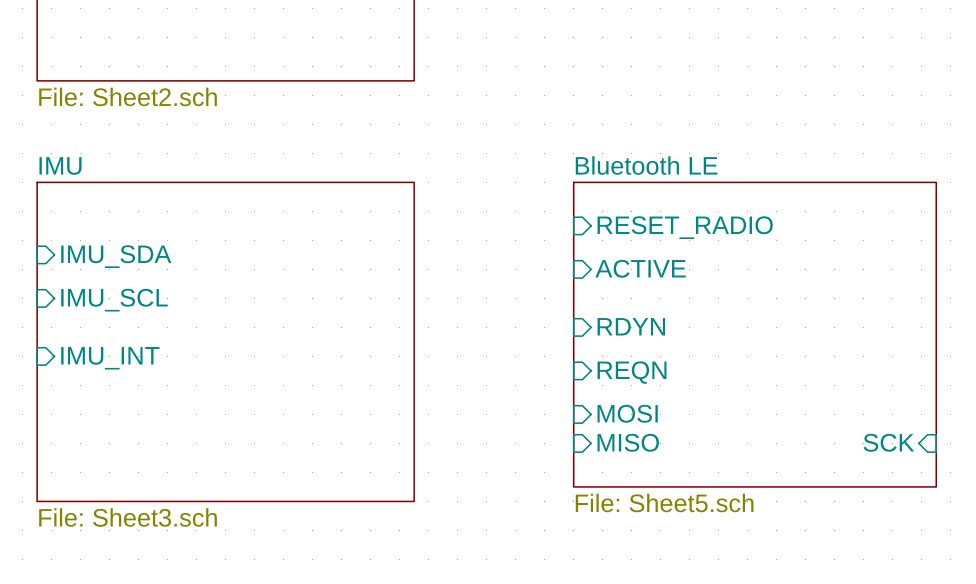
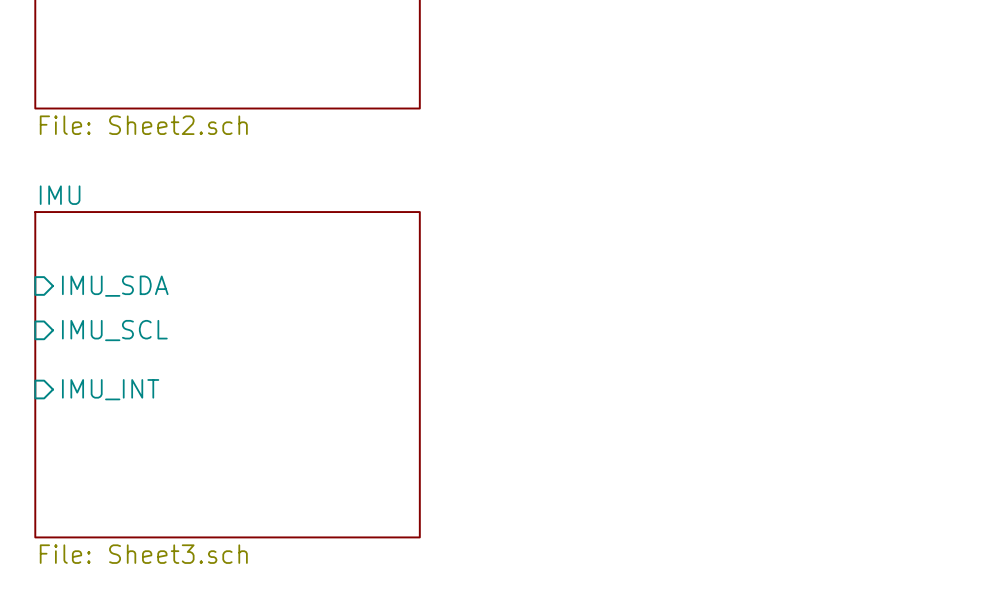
sheet pin: RESET_RADIO (685, 227) -> none
sheet pin: ACTIVE (640, 268) -> none
sheet pin: RDYN (631, 326) -> none
sheet Bluetooth LE: File: Sheet5.sch (754, 334) -> none
sheet pin: REQN (632, 372) -> none
sheet pin: MOSI (627, 413) -> none
sheet pin: MISO (628, 442) -> none
sheet pin: SCK (888, 442) -> none

